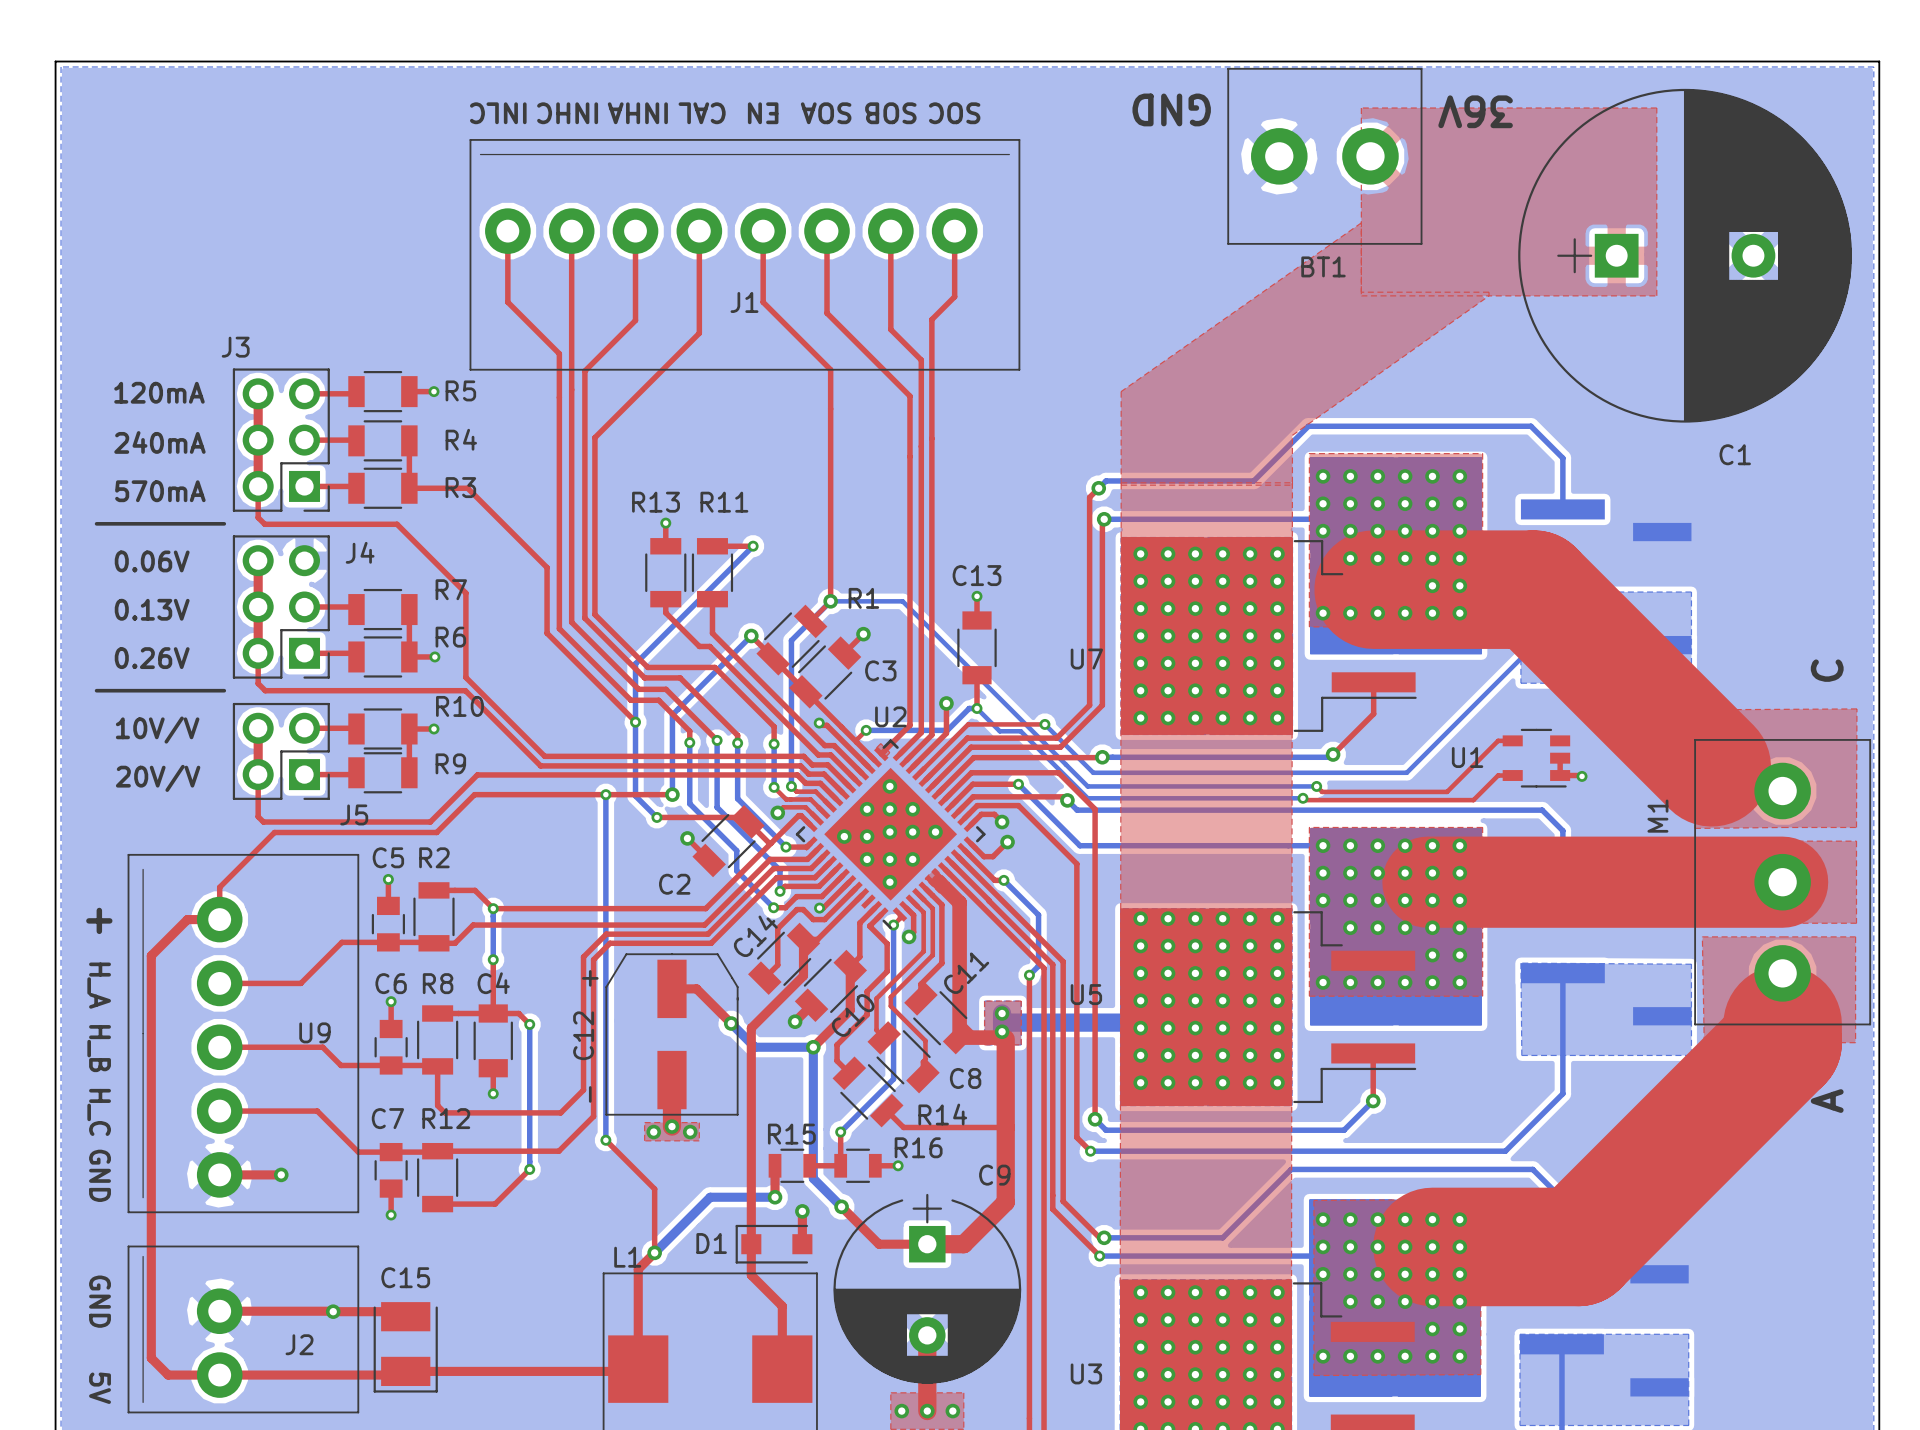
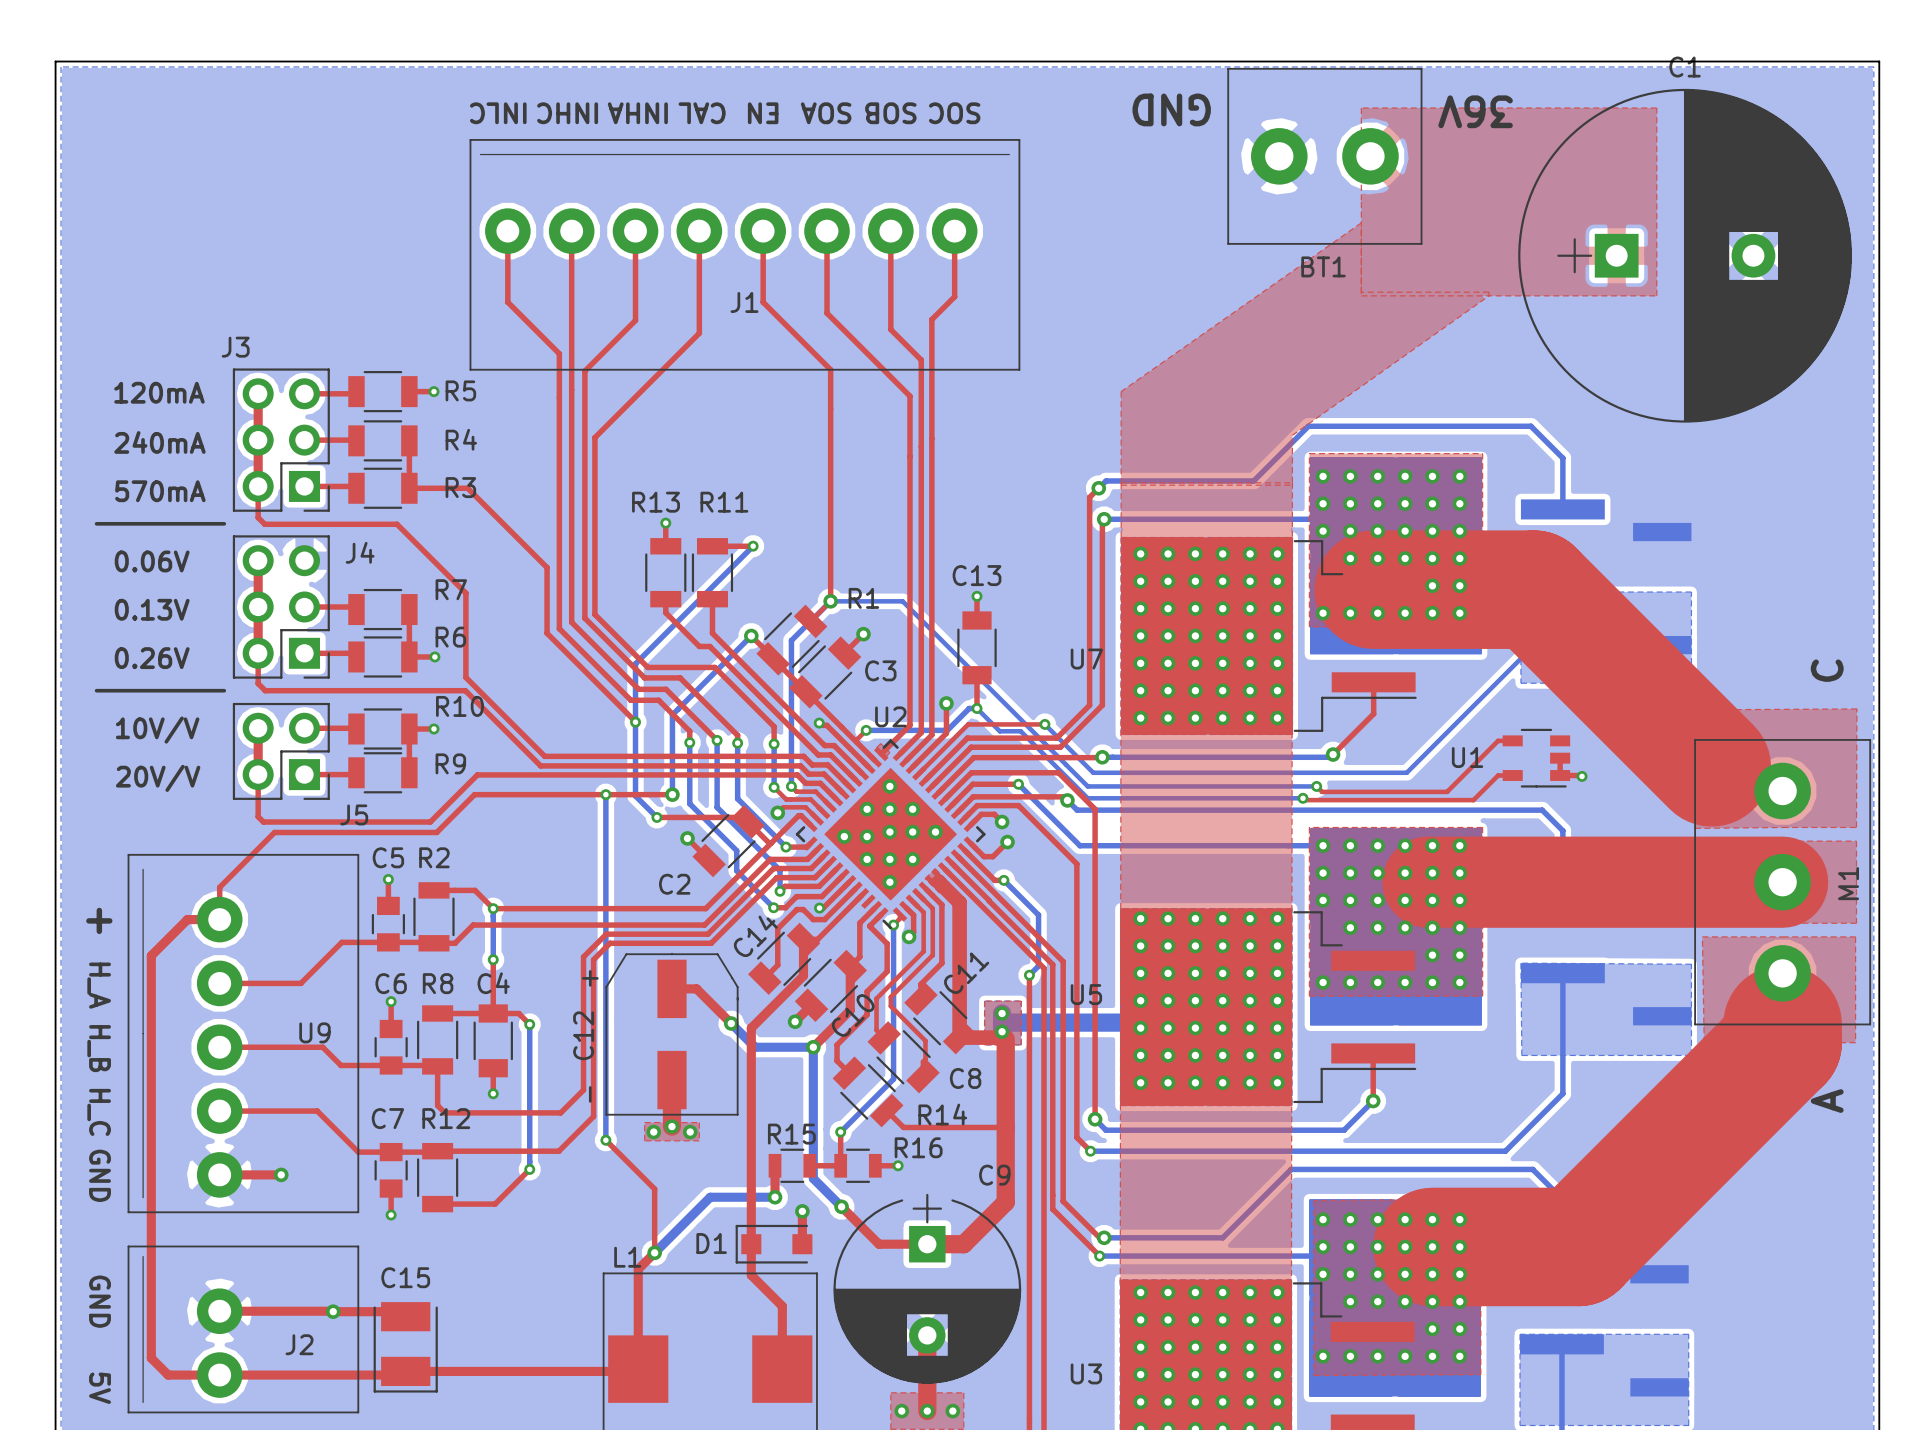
C1 name position: C1 (1735, 454) -> C1 (1685, 67)
M1 name position: M1 (1657, 816) -> M1 (1848, 883)

